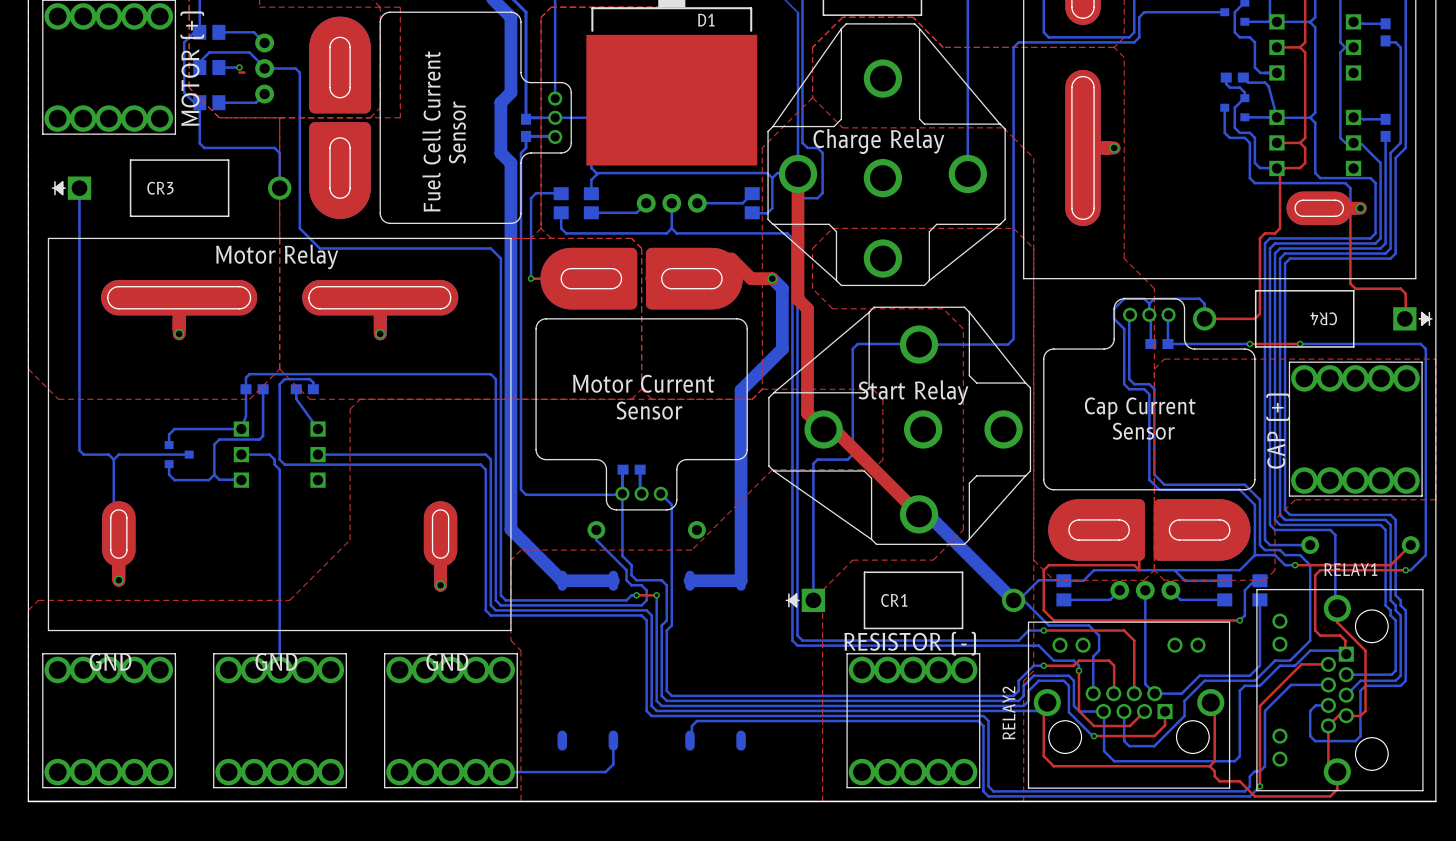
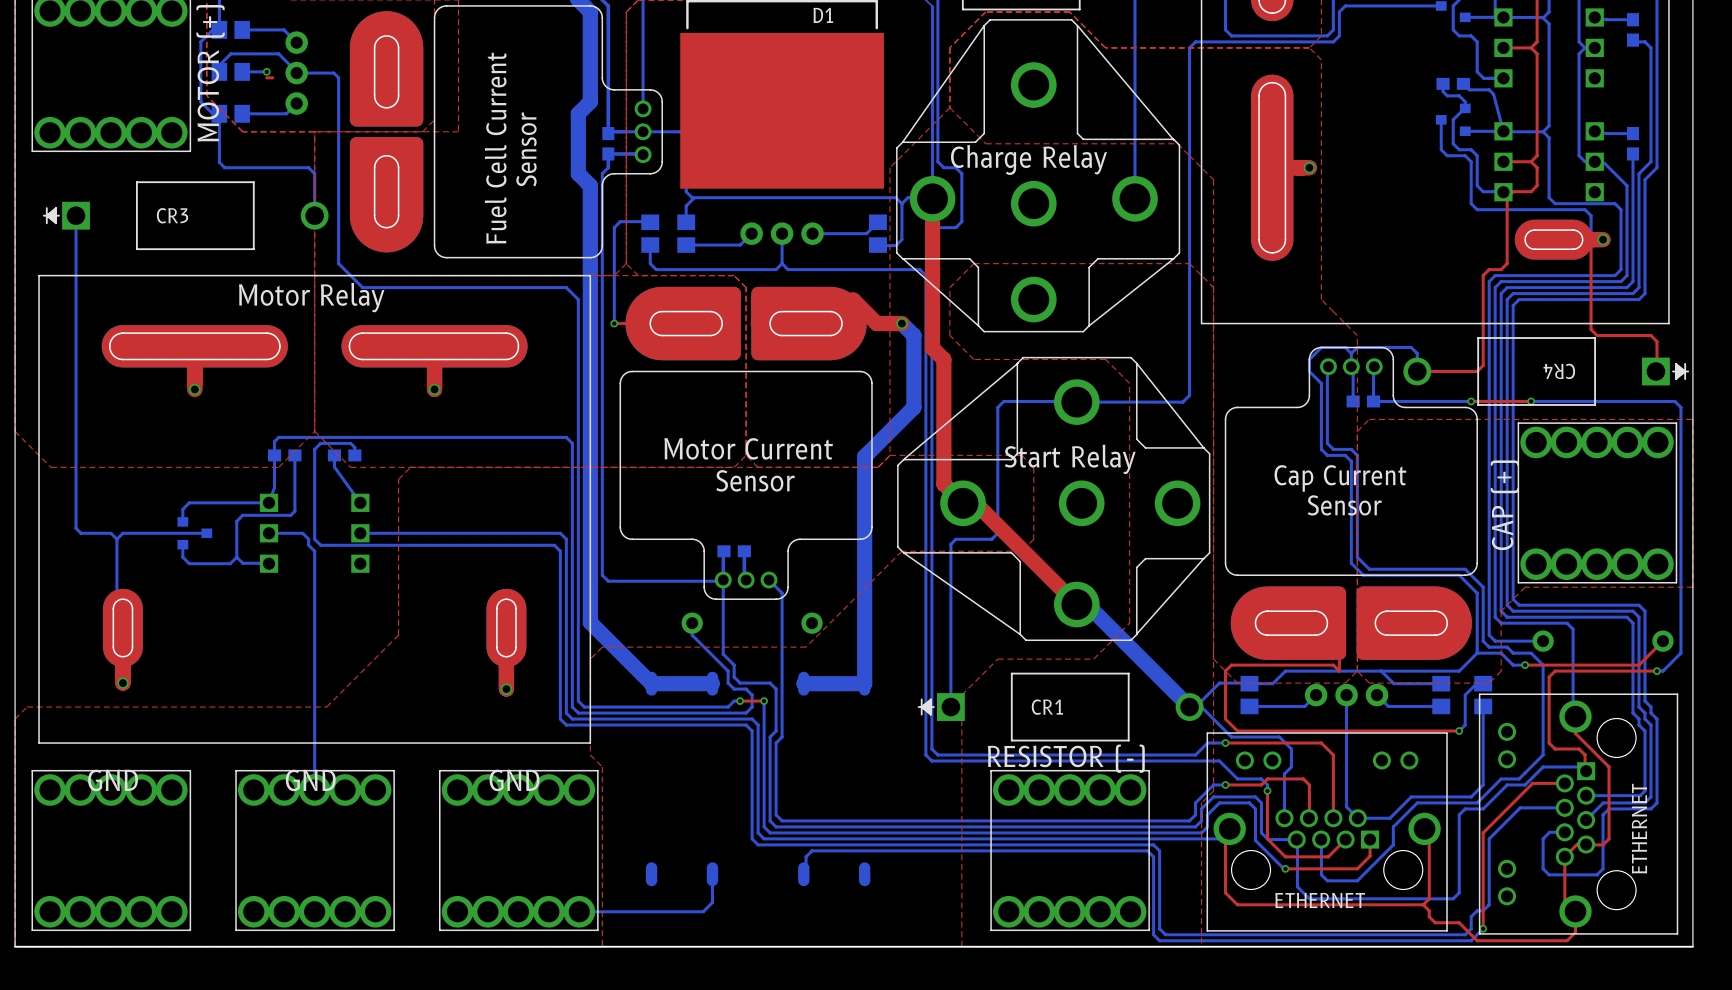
RELAY1 name: RELAY1 (1350, 569) -> none
RELAY1 value: none -> ETHERNET (1639, 828)
RELAY2 name: RELAY2 (1008, 712) -> none
RELAY2 value: none -> ETHERNET (1320, 900)

